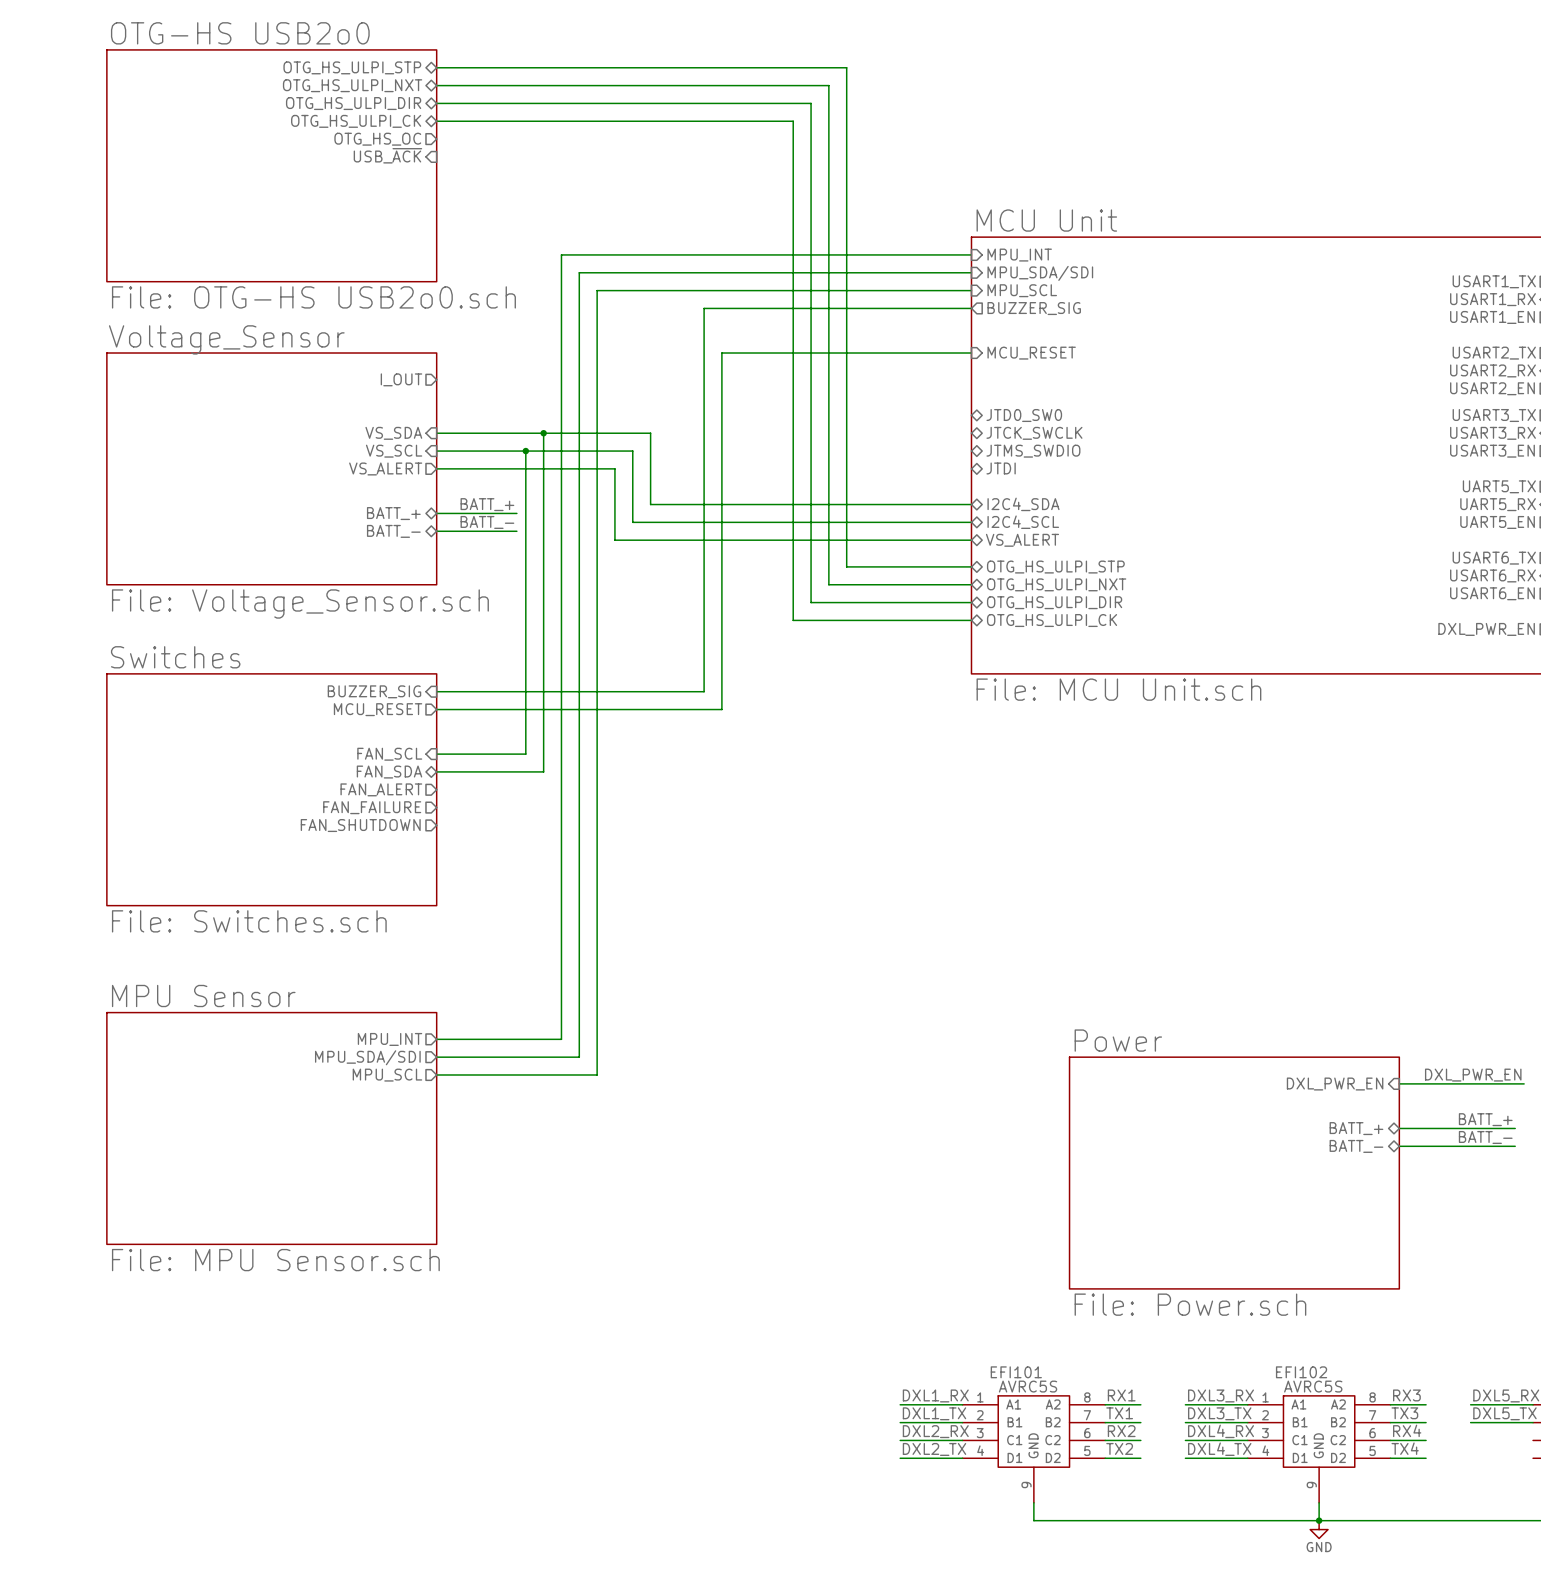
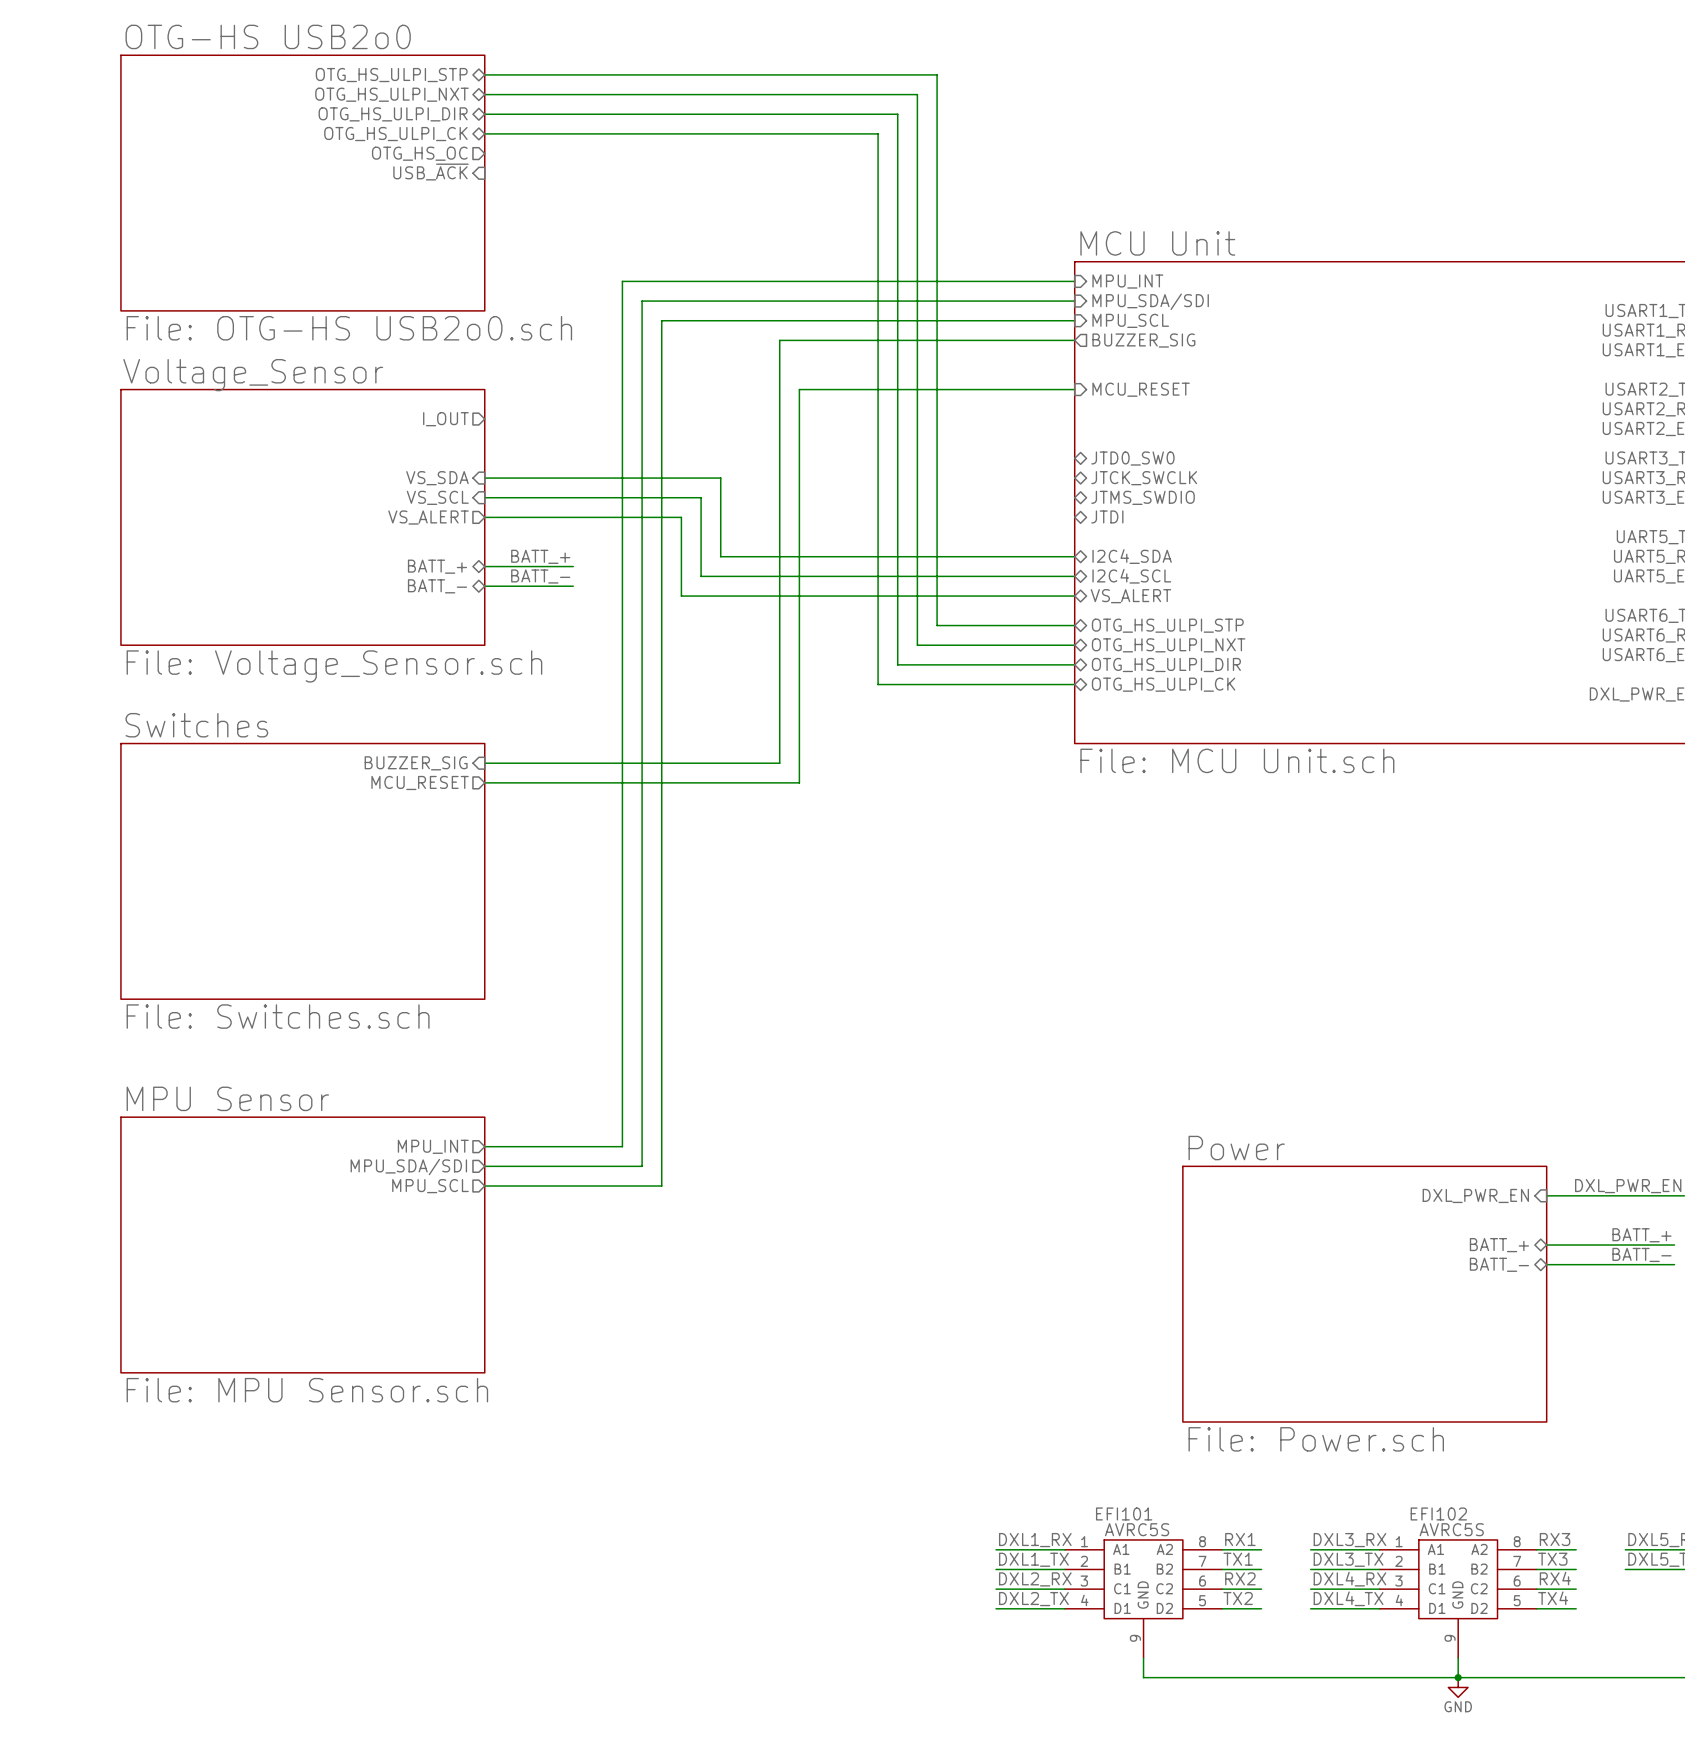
wire: (543, 433) (543, 771) (436, 771) -> none
junction: (543, 433) -> none
wire: (525, 451) (525, 754) (436, 754) -> none
junction: (525, 451) -> none
sheet pin: FAN_SCL (389, 754) -> none
sheet pin: FAN_SDA (389, 772) -> none
sheet pin: FAN_ALERT (381, 789) -> none
sheet pin: FAN_FAILURE (372, 807) -> none
sheet pin: FAN_SHUTDOWN (360, 825) -> none

